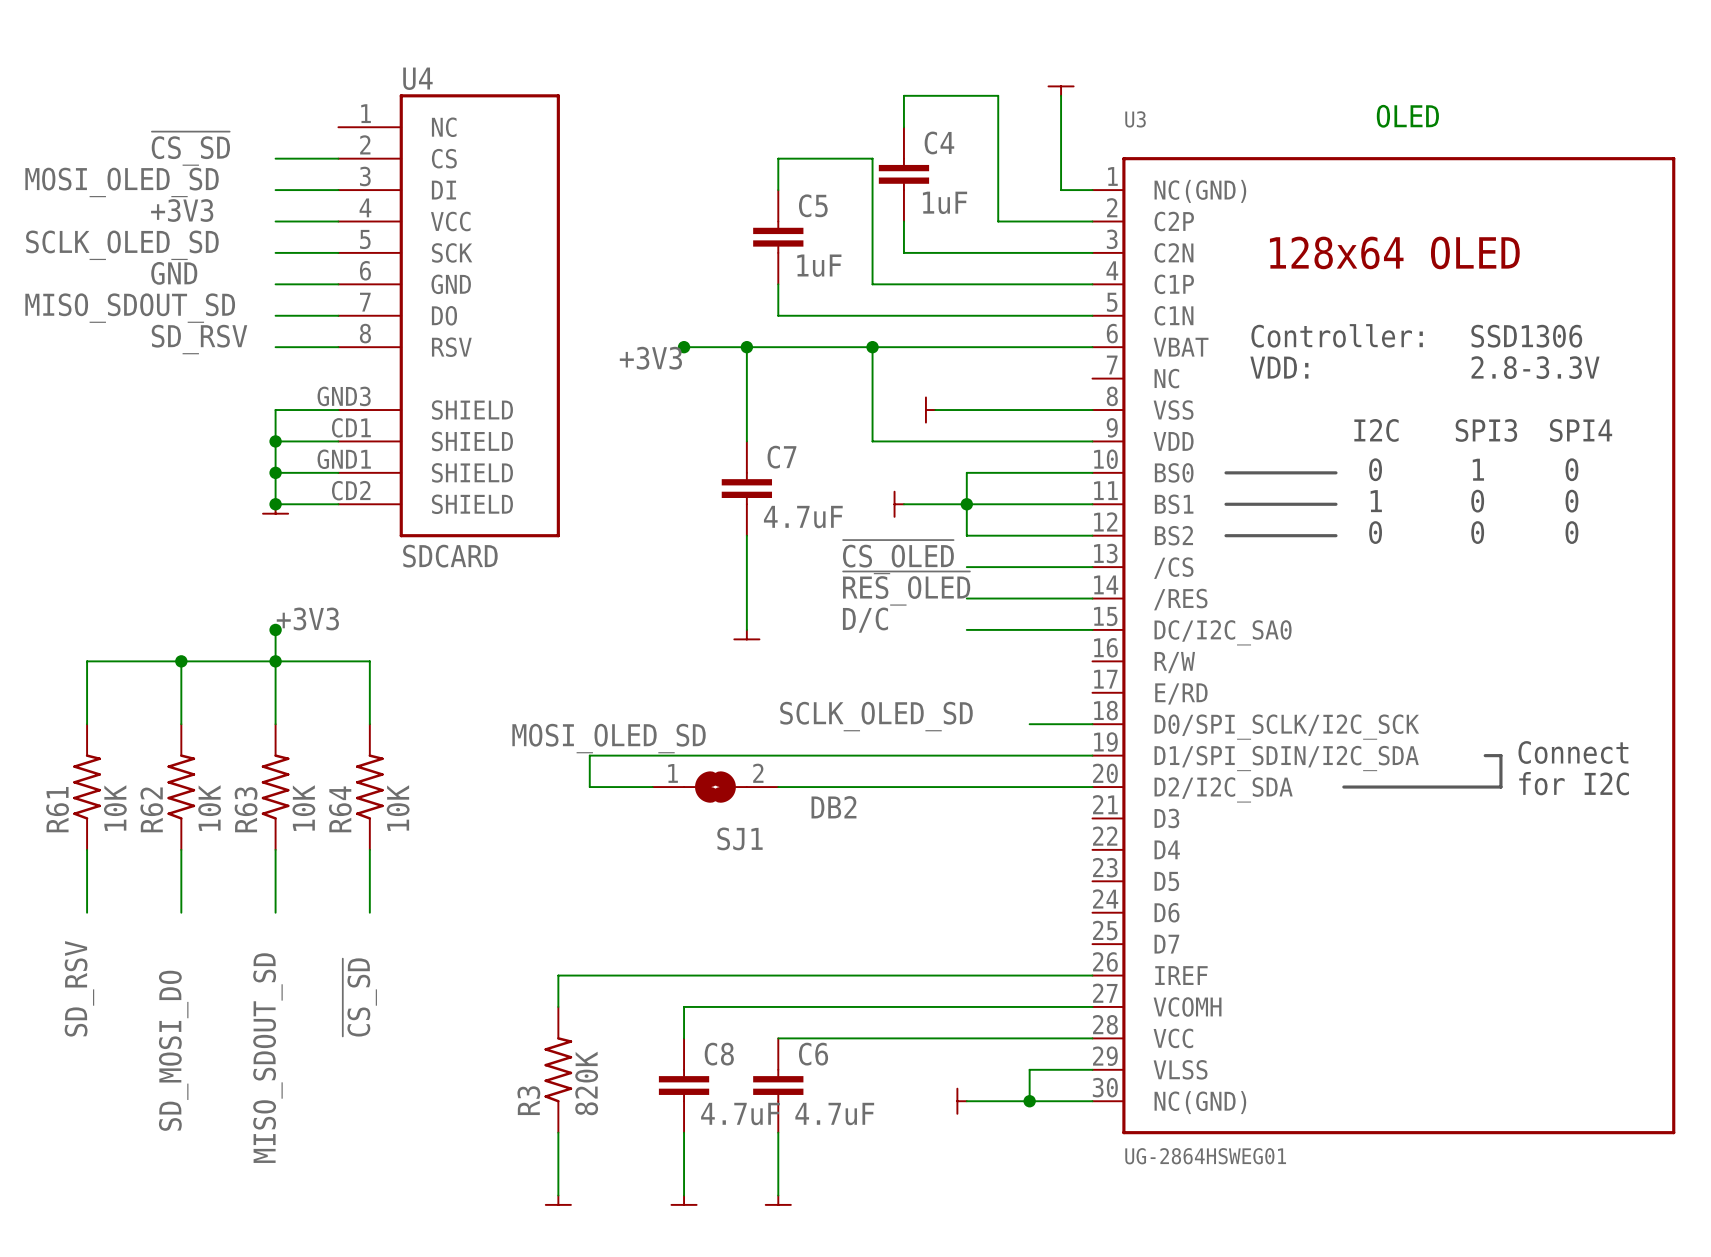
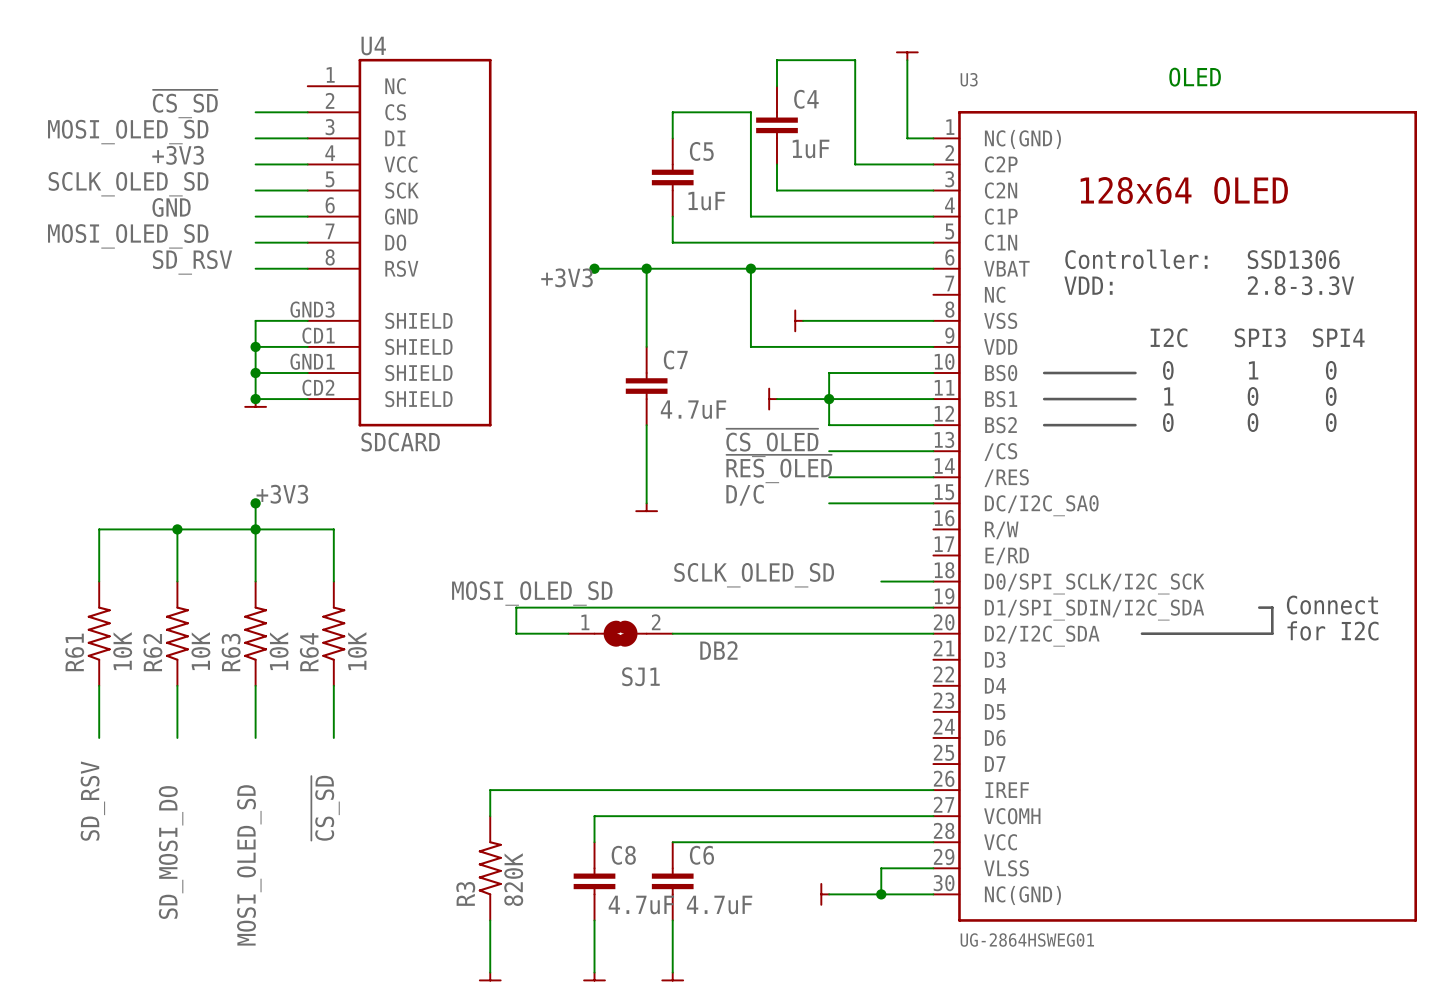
label: MISO_SDOUT_SD (130, 308) -> MOSI_OLED_SD (128, 236)
label: MISO_SDOUT_SD (267, 1058) -> MOSI_OLED_SD (249, 865)

